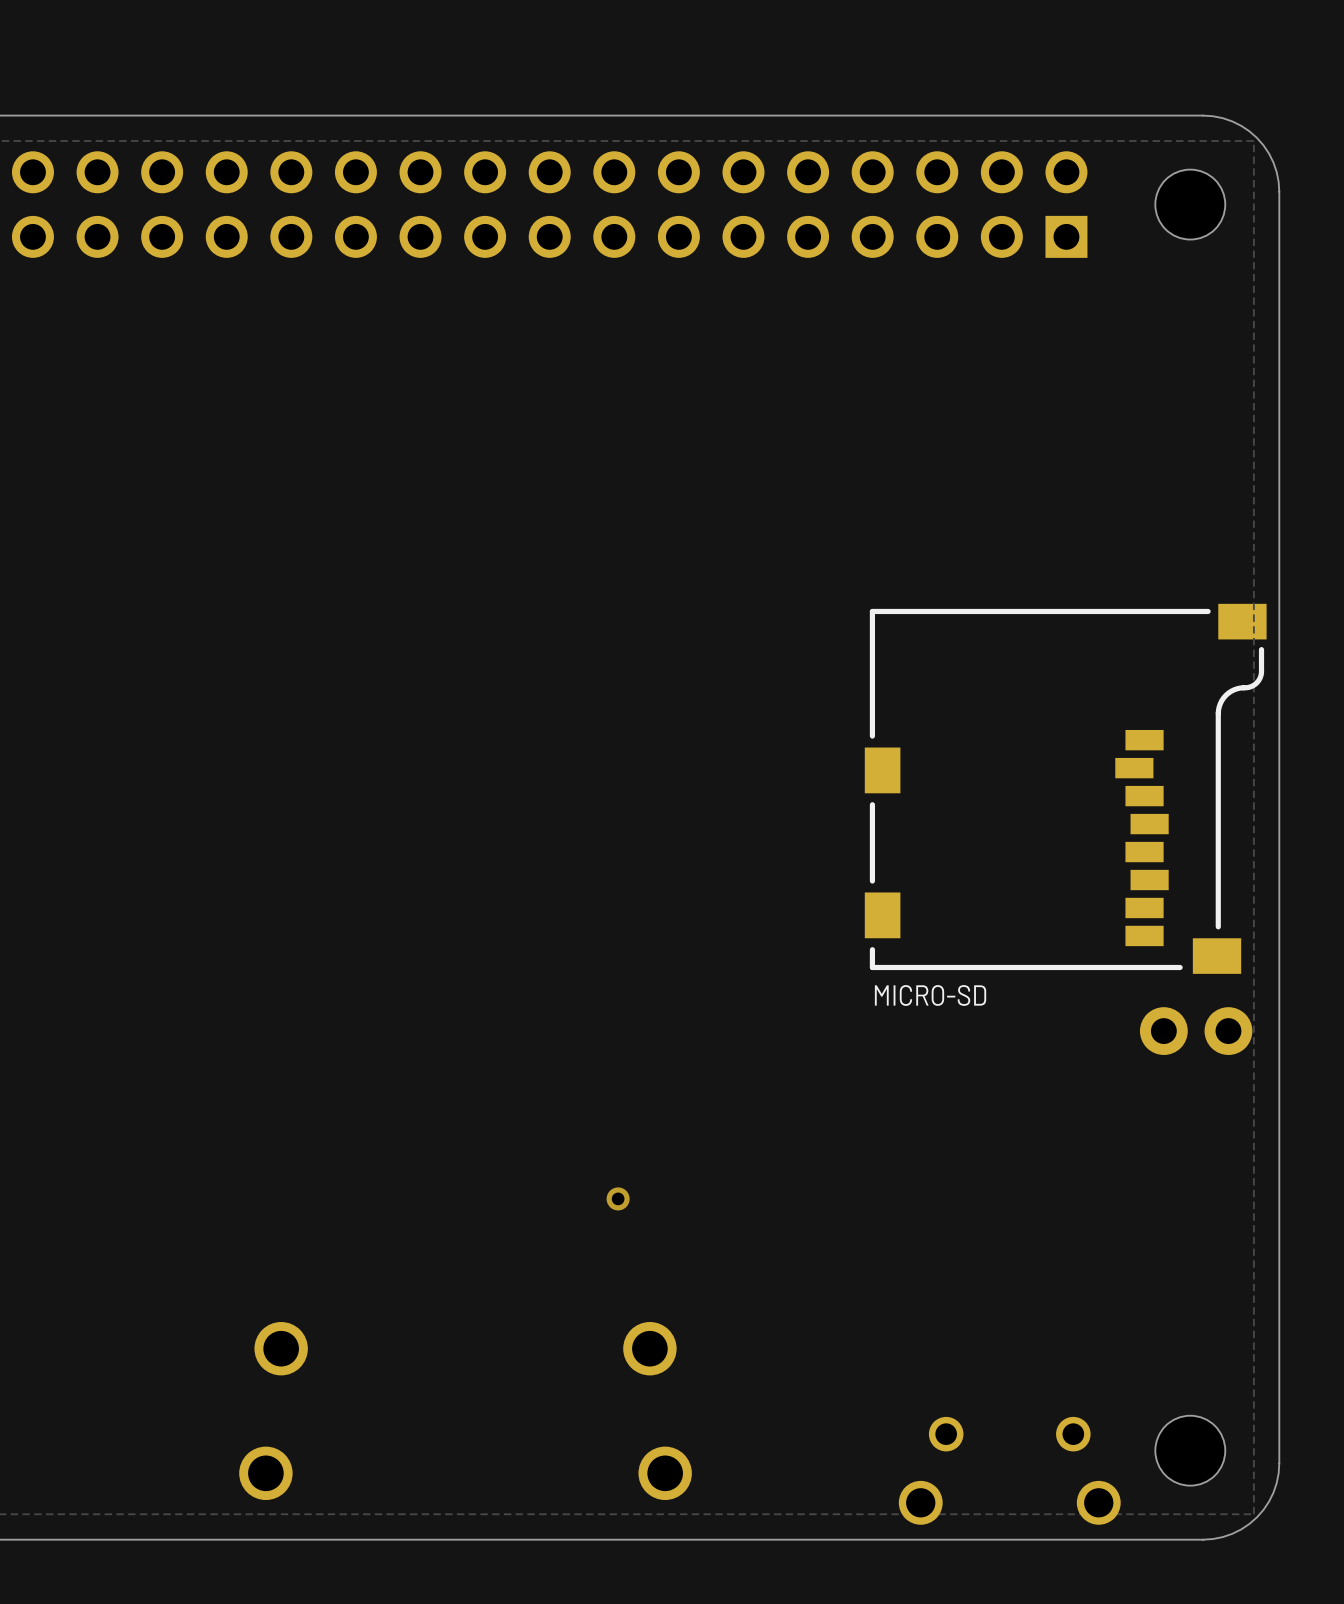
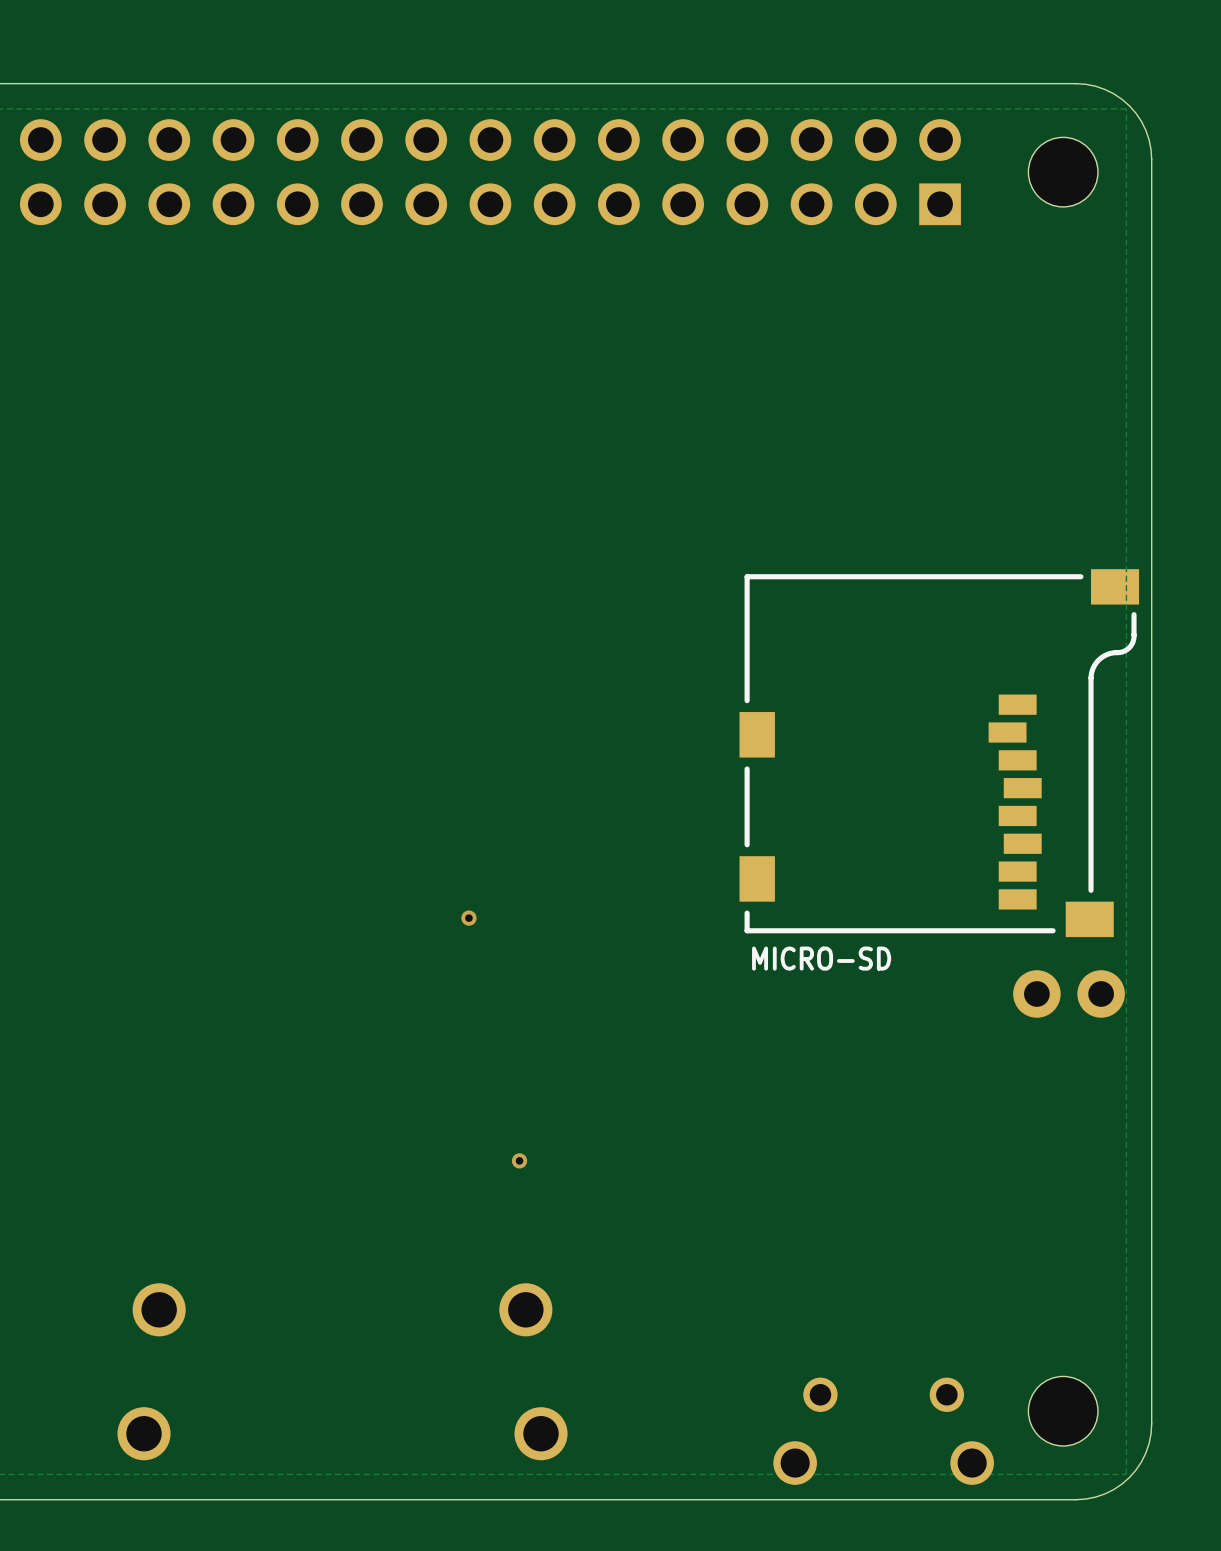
via: none -> (468, 918)
via: (618, 1198) -> none
via: none -> (519, 1160)

